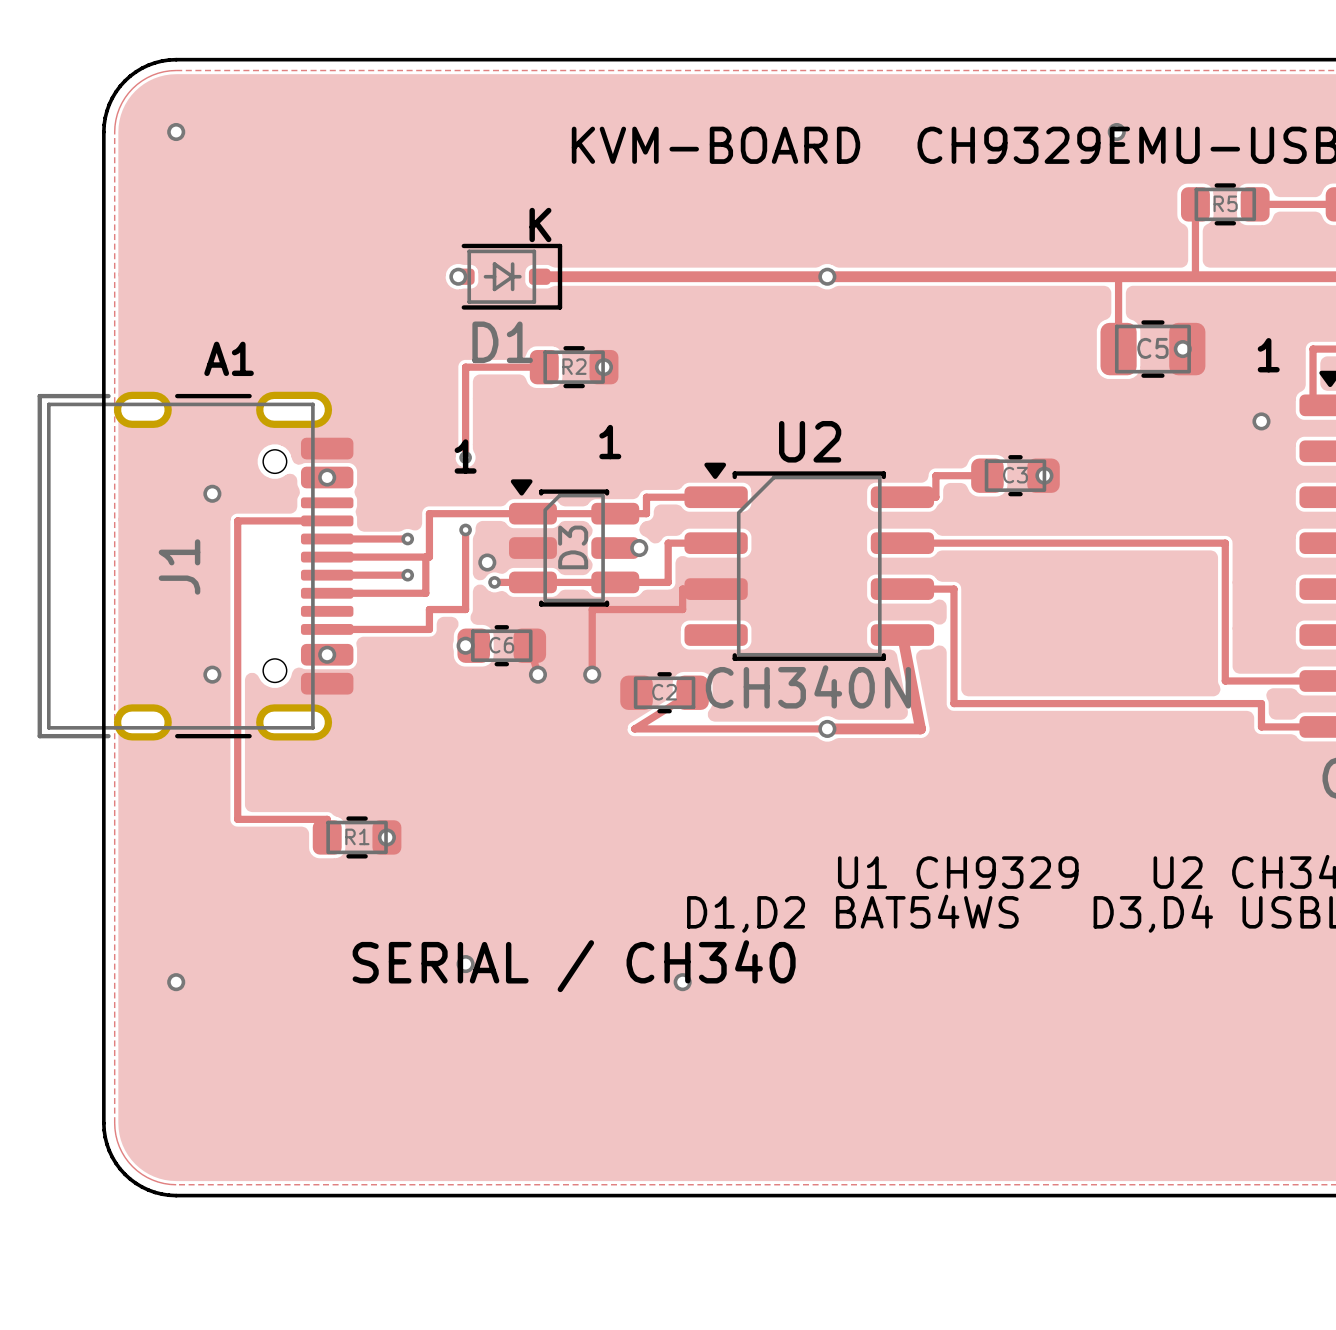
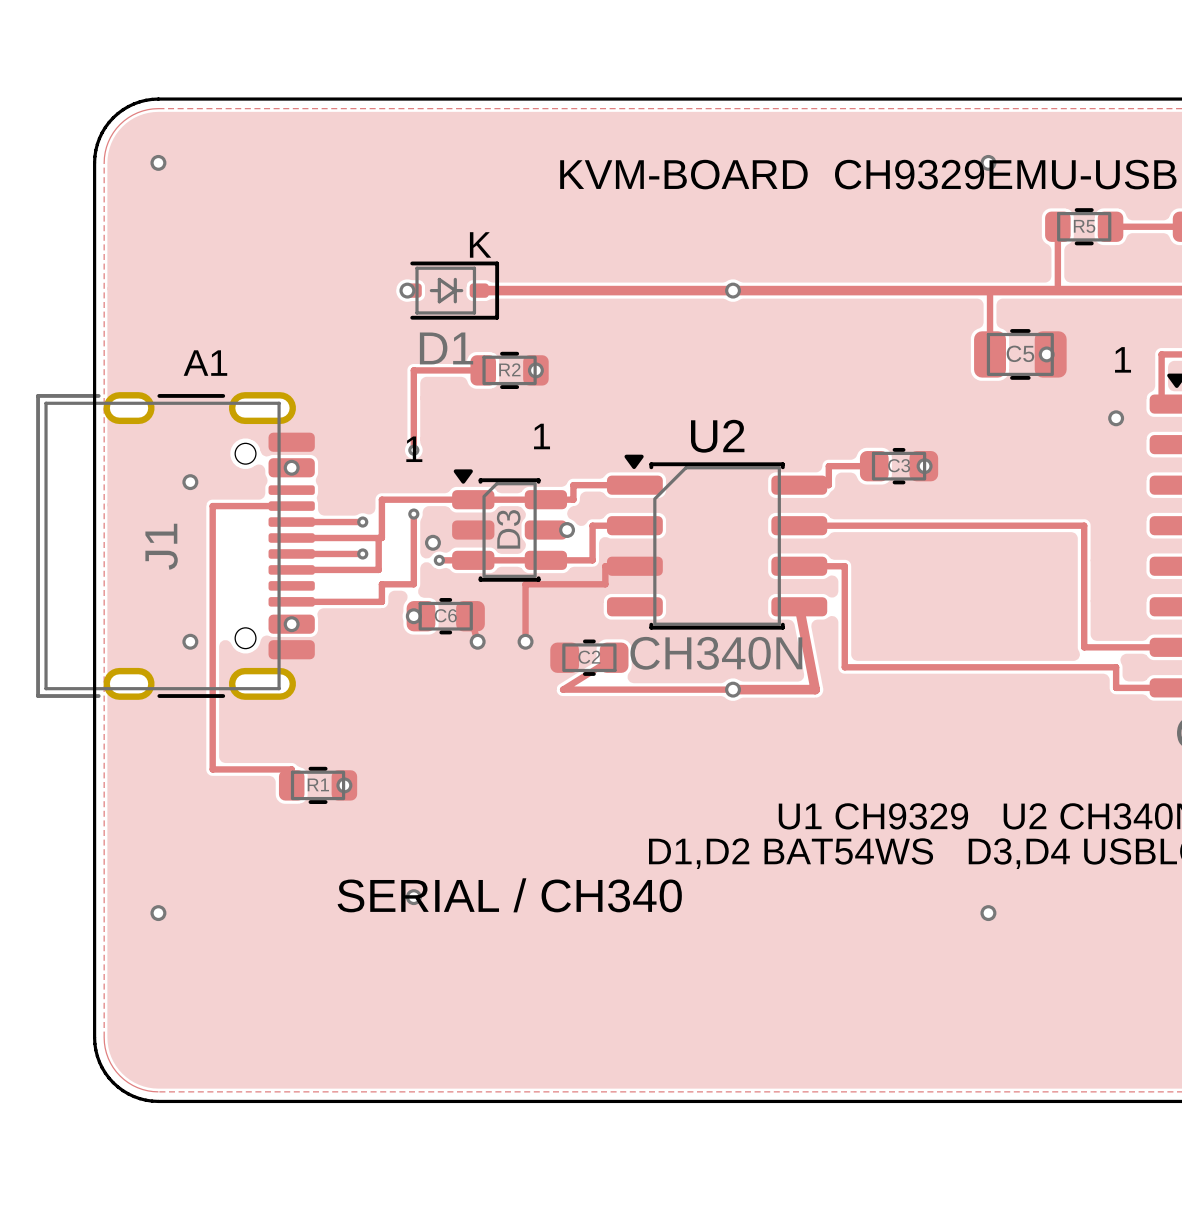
via: (682, 982) -> none
via: none -> (988, 913)

